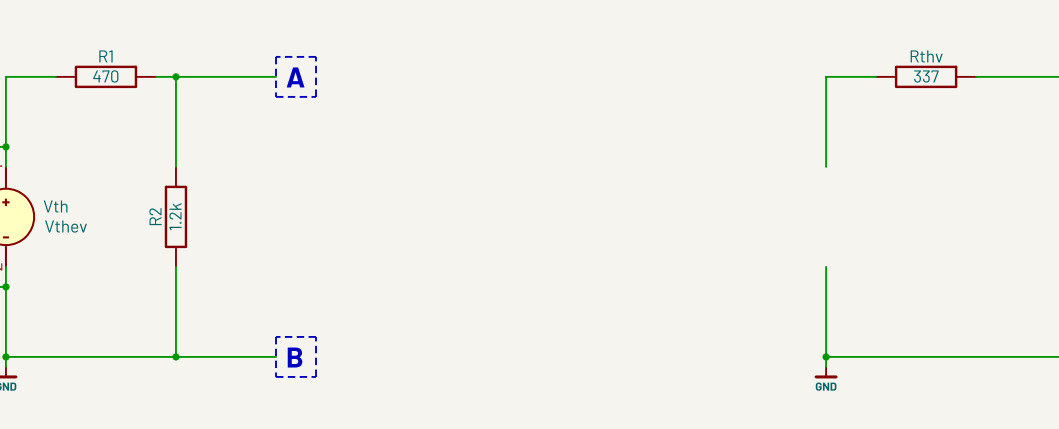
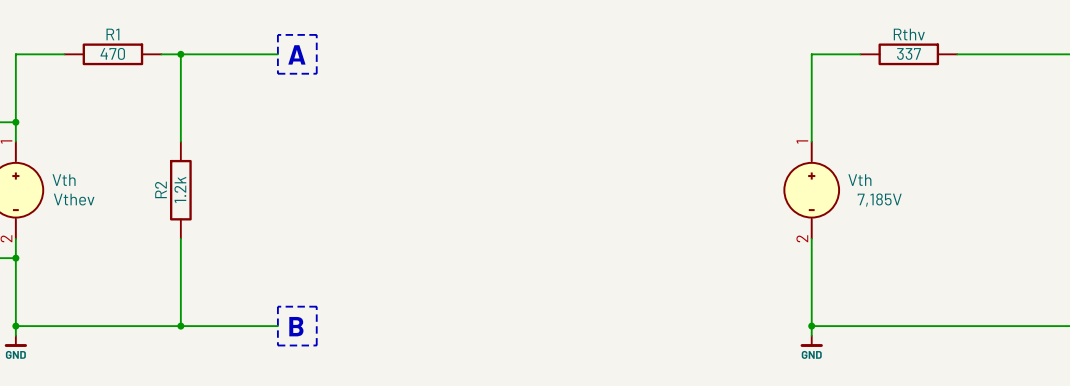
Vth: none -> 7,185V (811, 190)

